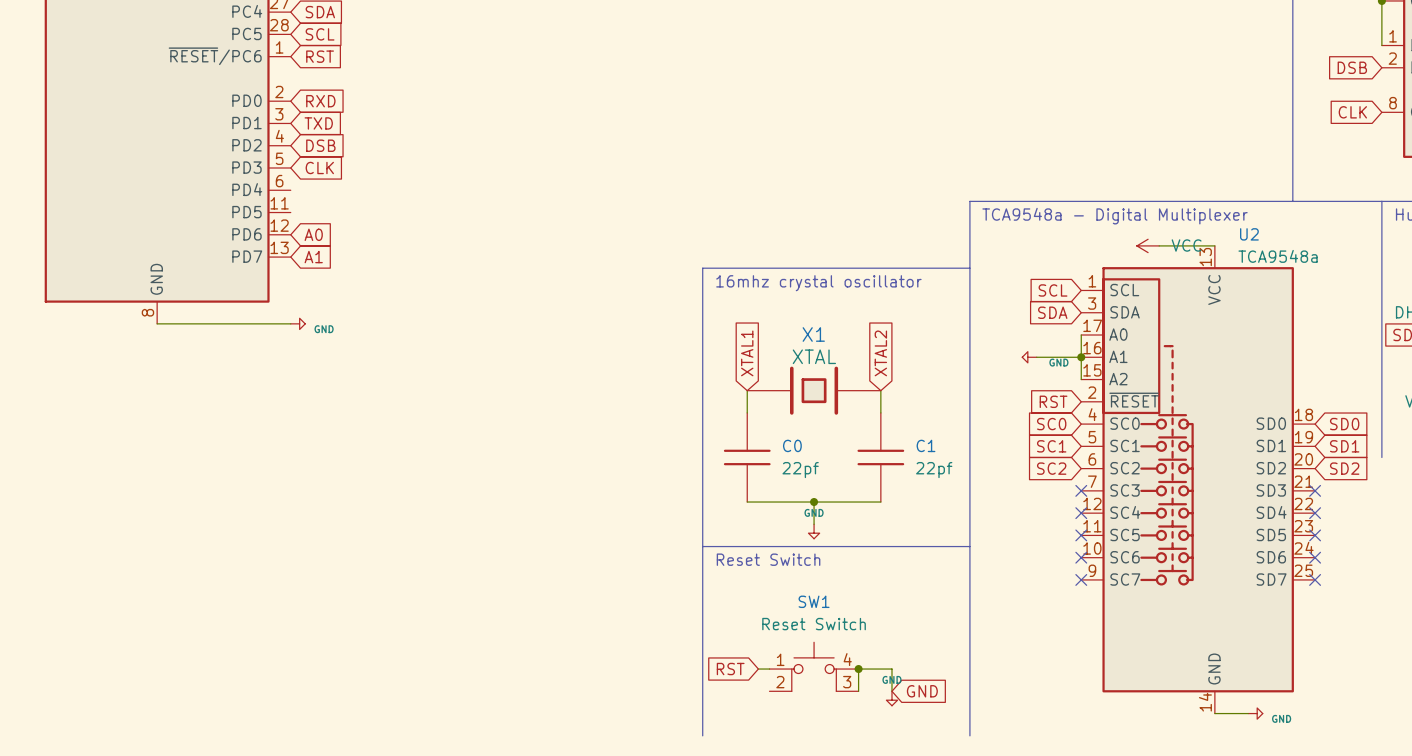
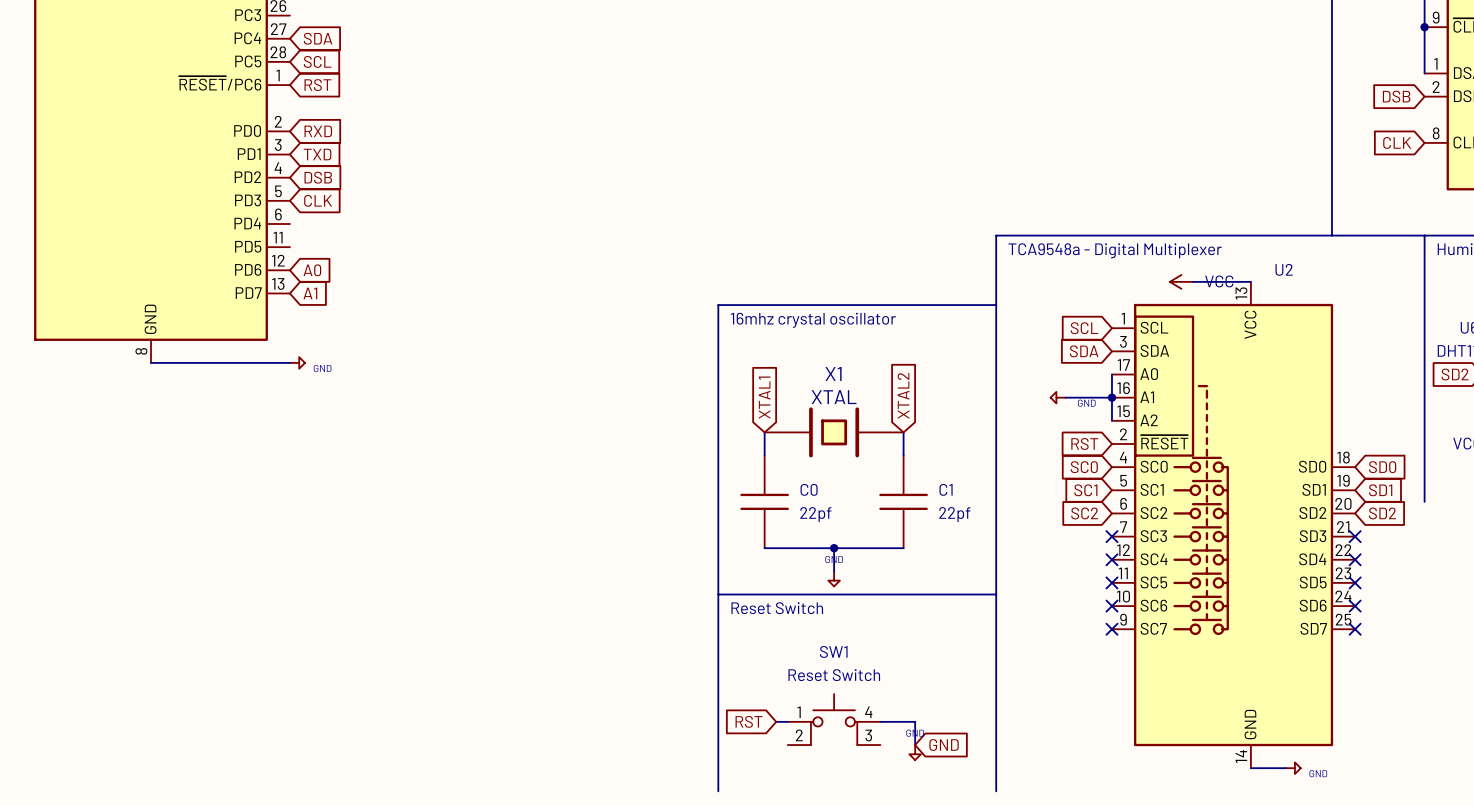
U2 value: TCA9548a (1278, 256) -> none
wire: (858, 669) (858, 691) -> none
junction: (858, 669) -> none

